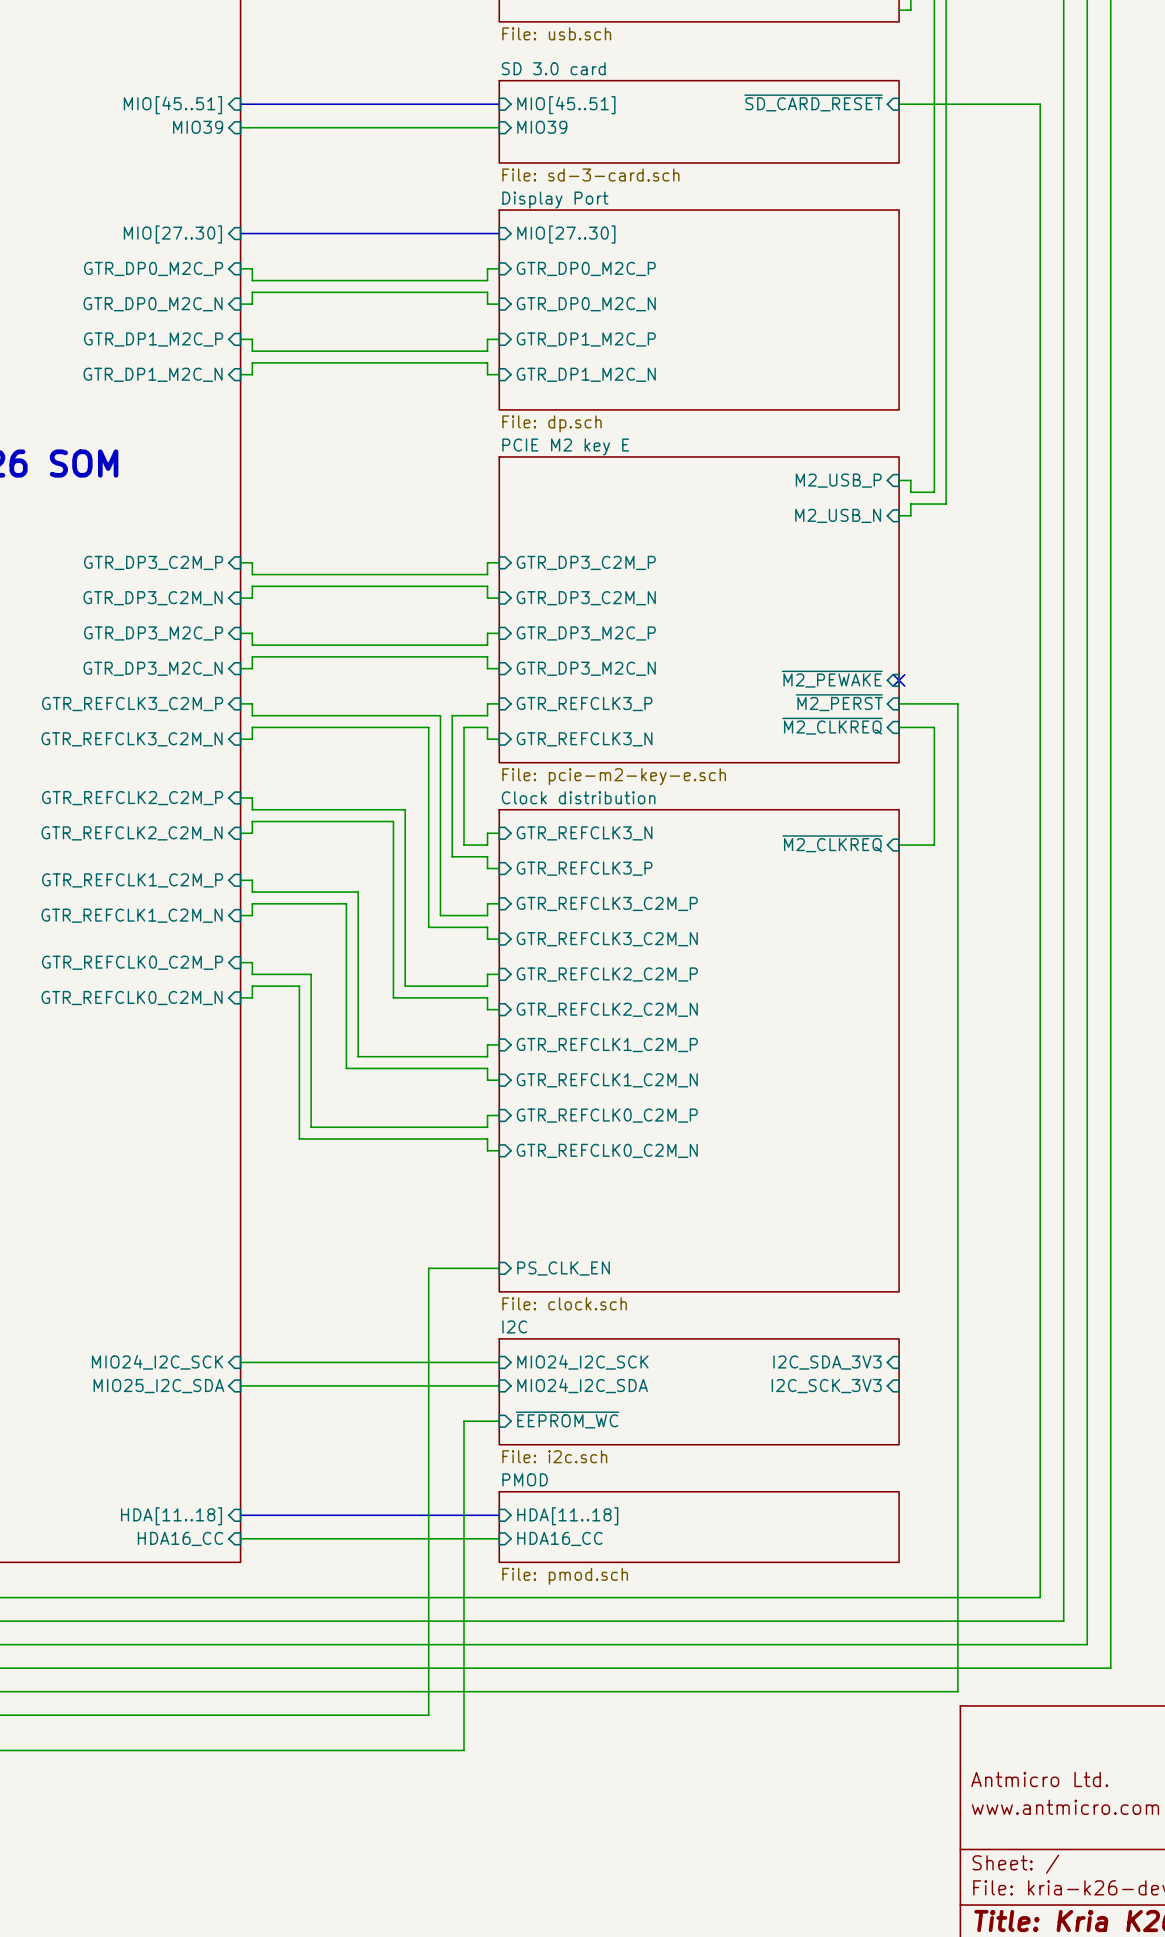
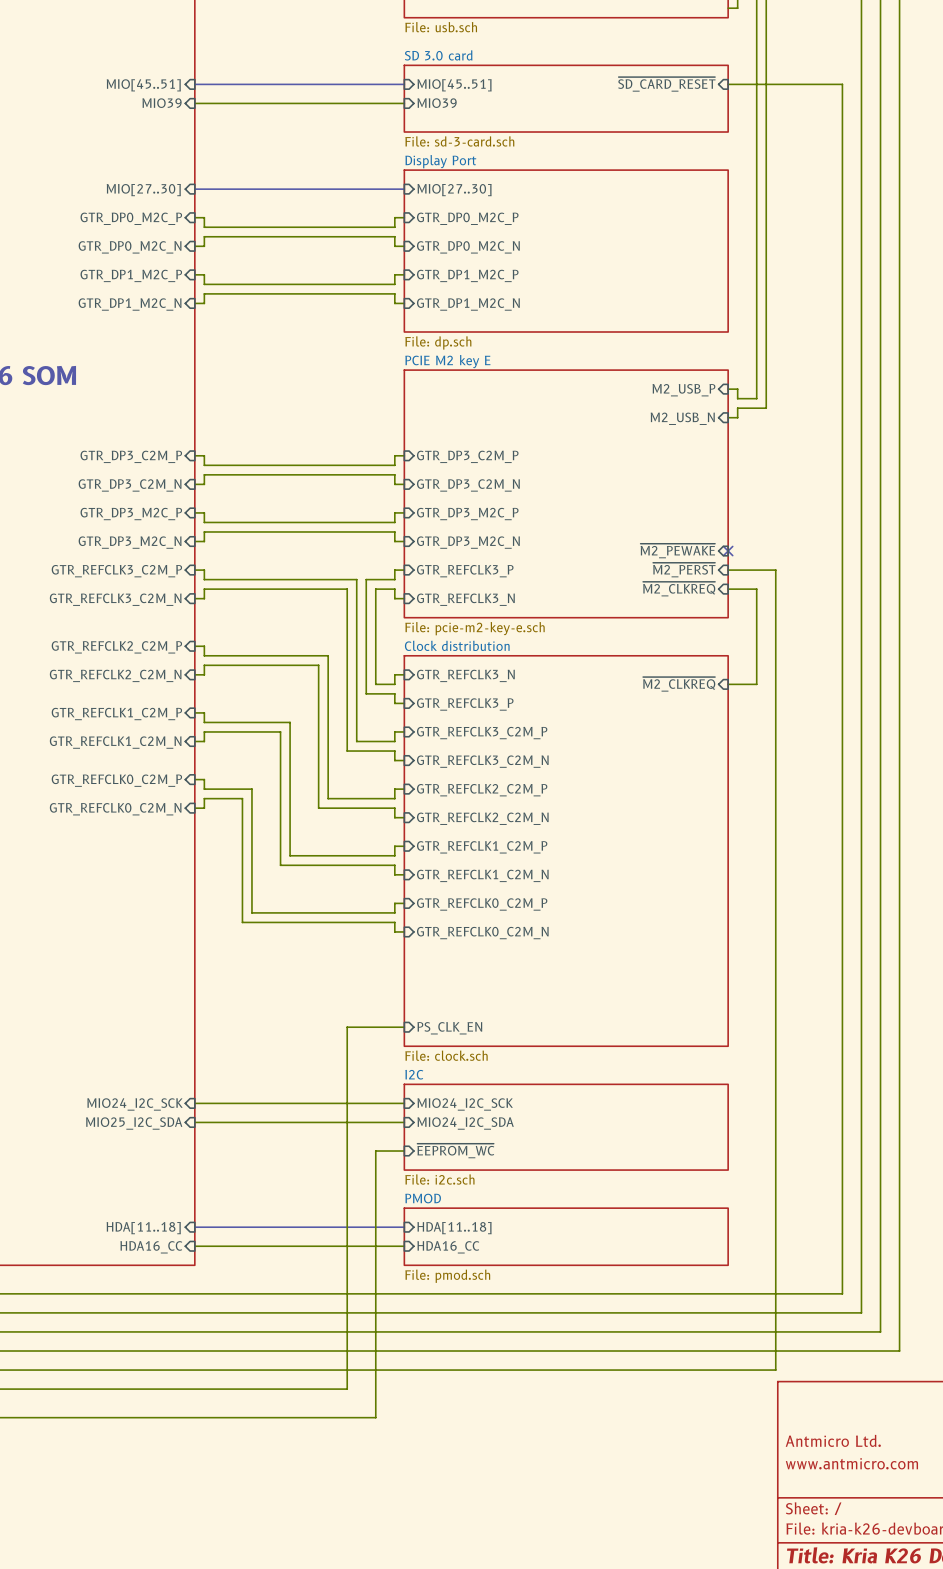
sheet pin: I2C_SDA_3V3 (827, 1362) -> none
sheet pin: I2C_SCK_3V3 (826, 1386) -> none

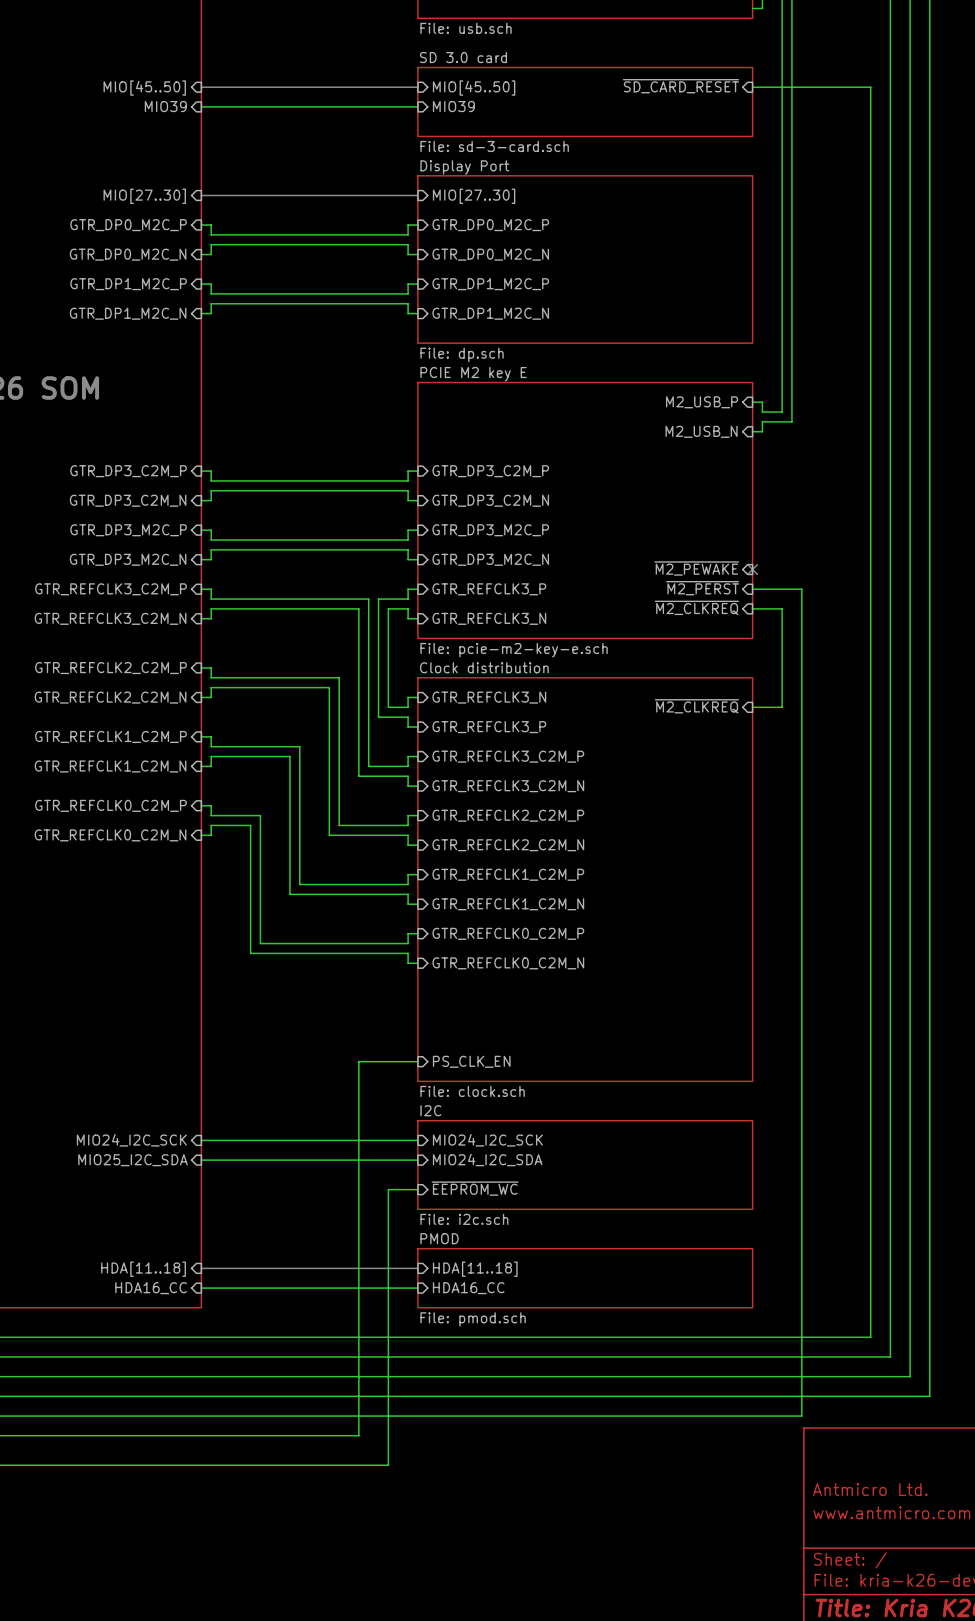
sheet pin: MIO[45..51] (143, 85) -> MIO[45..50] (144, 88)
sheet pin: MIO[45..51] (454, 85) -> MIO[45..50] (474, 88)

